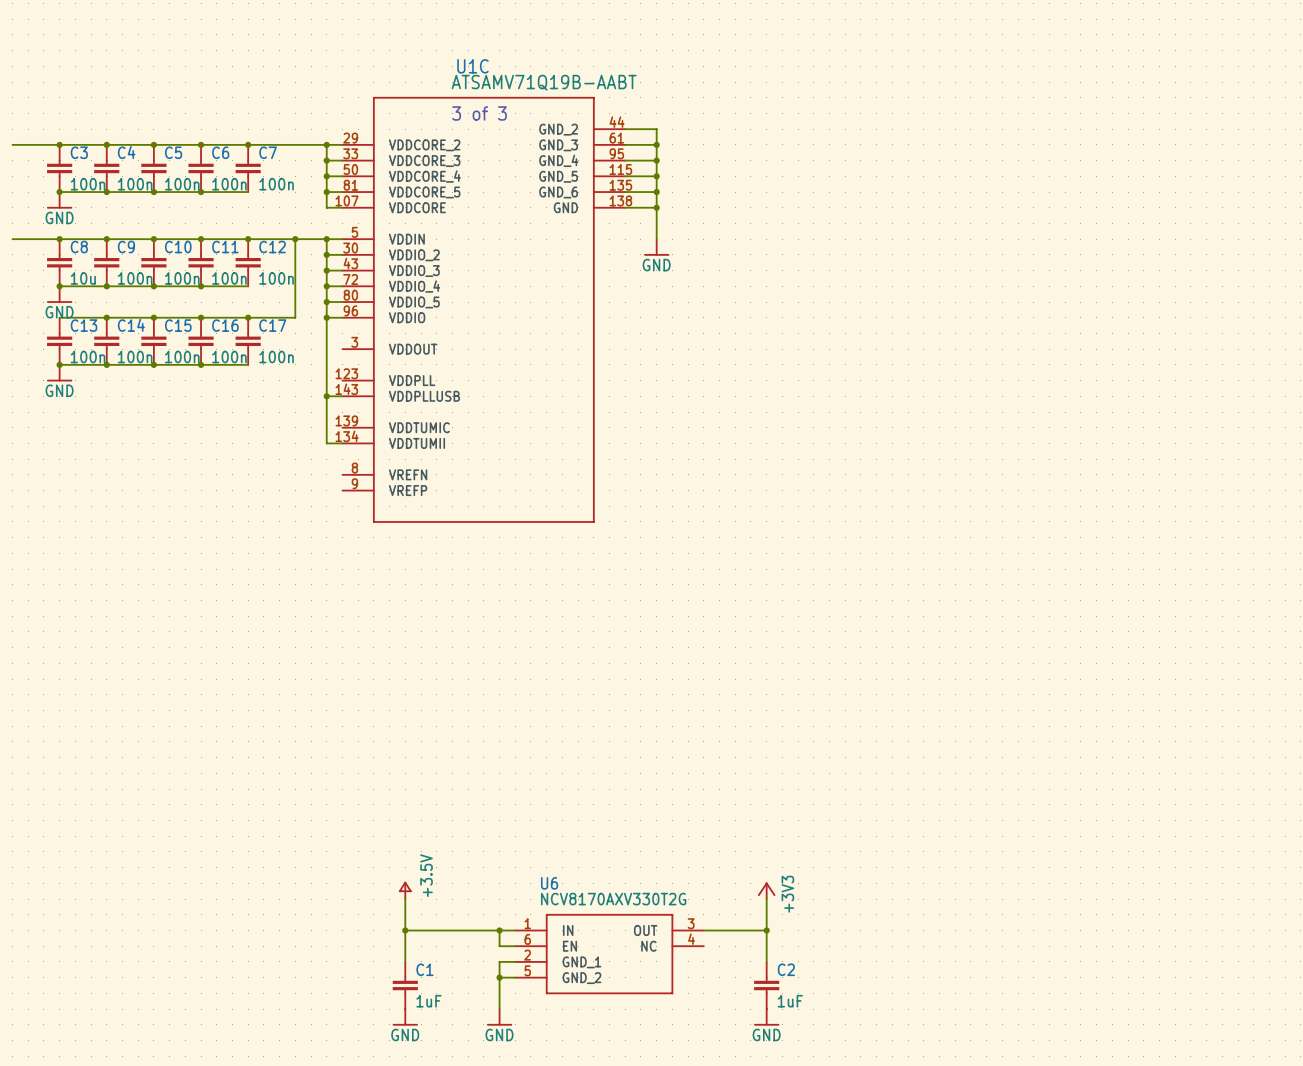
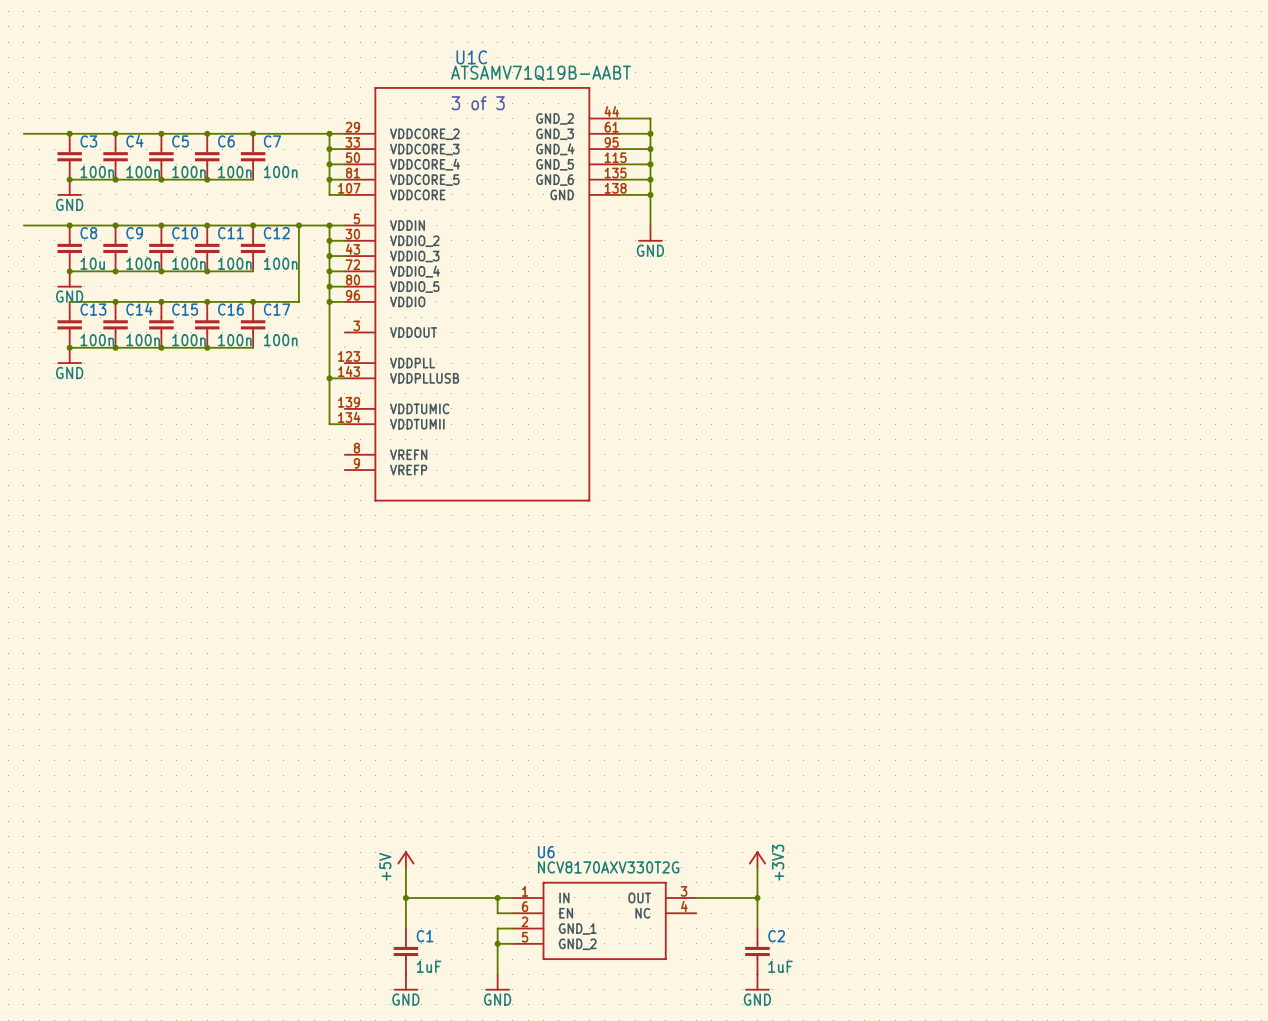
power symbol: +3.5V (405, 890) -> +5V (405, 859)

